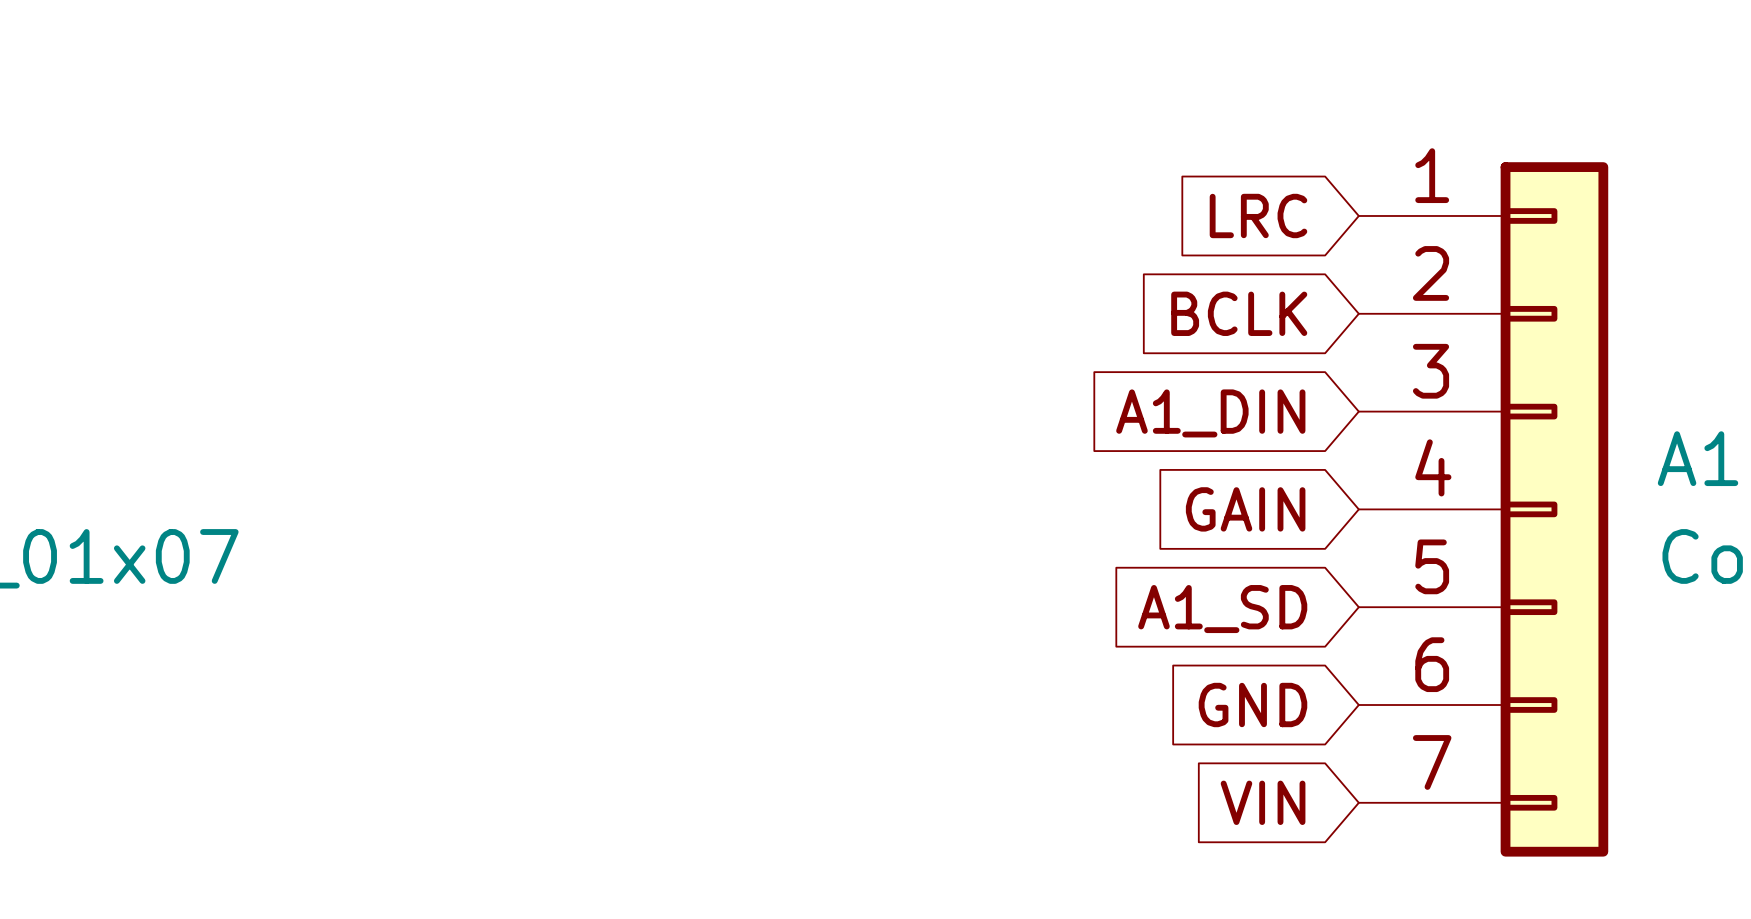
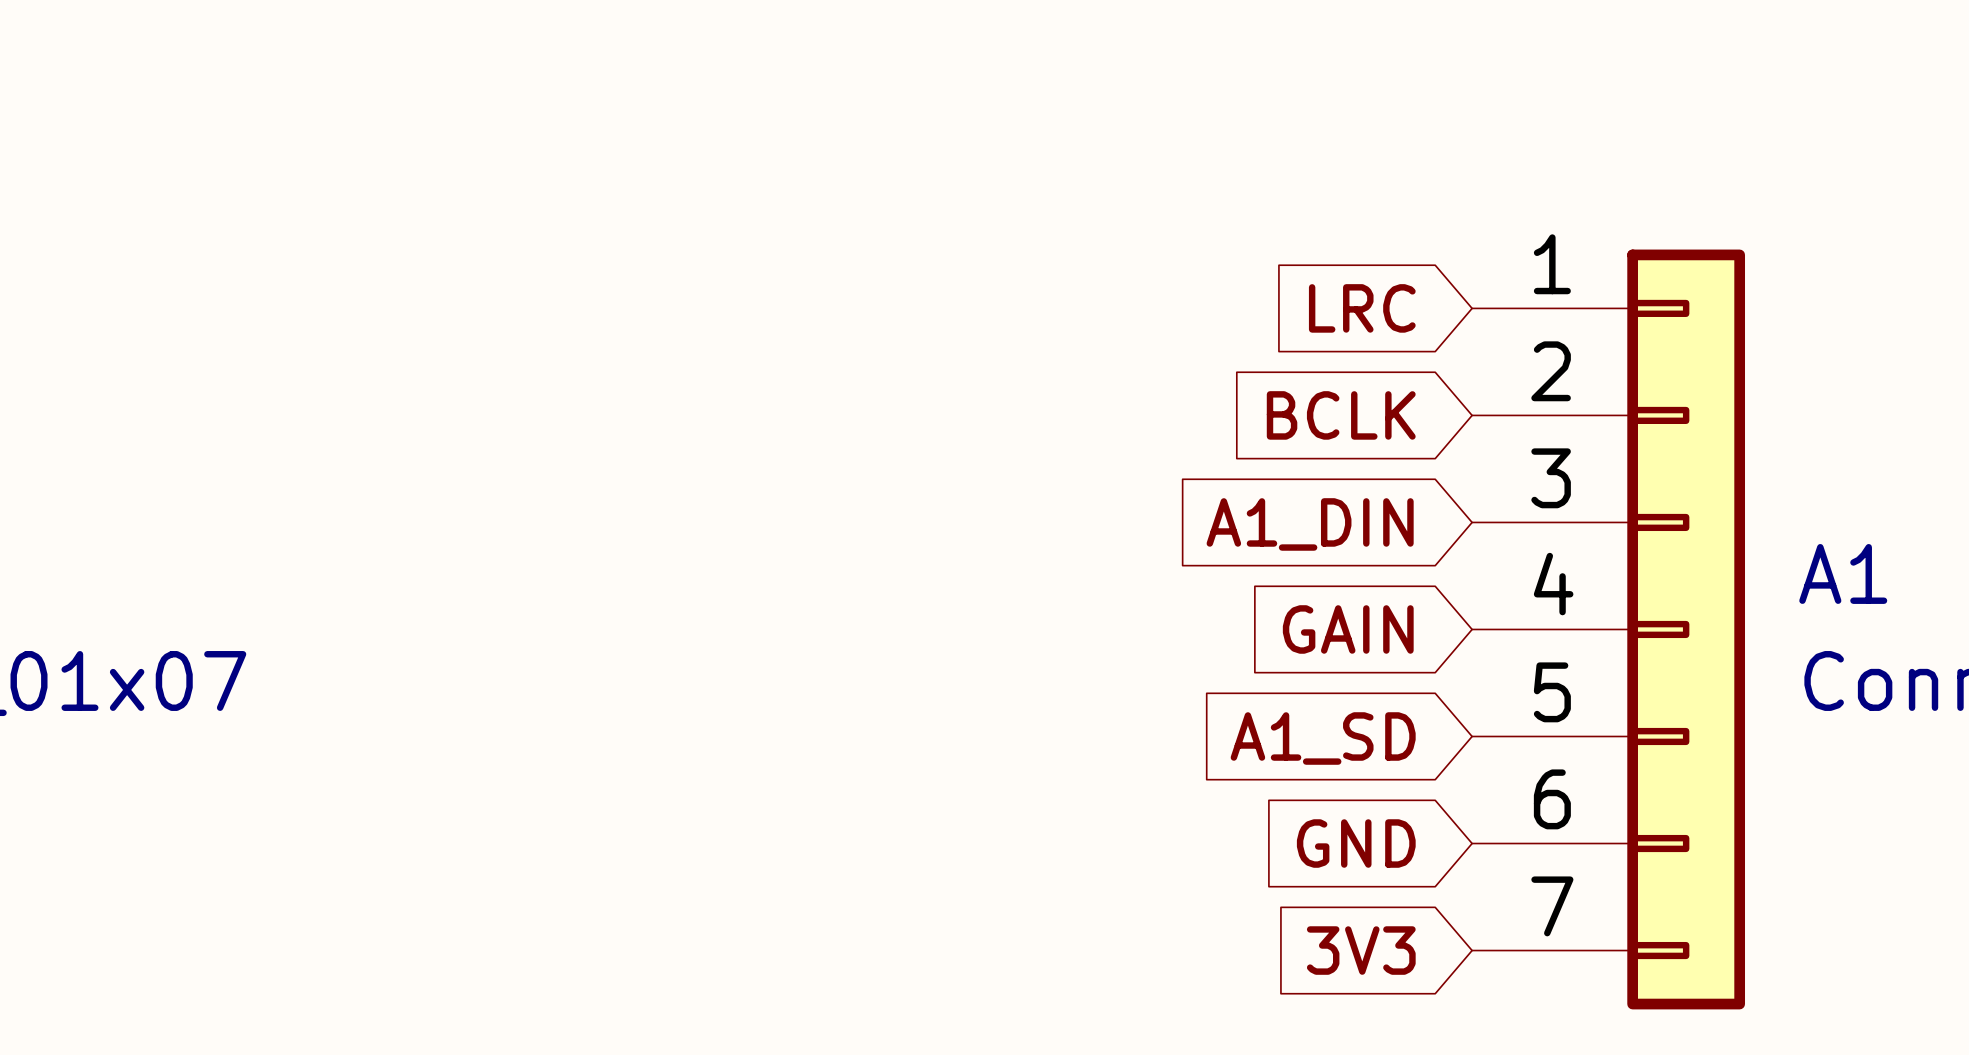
global label: VIN (1263, 802) -> 3V3 (1361, 950)

